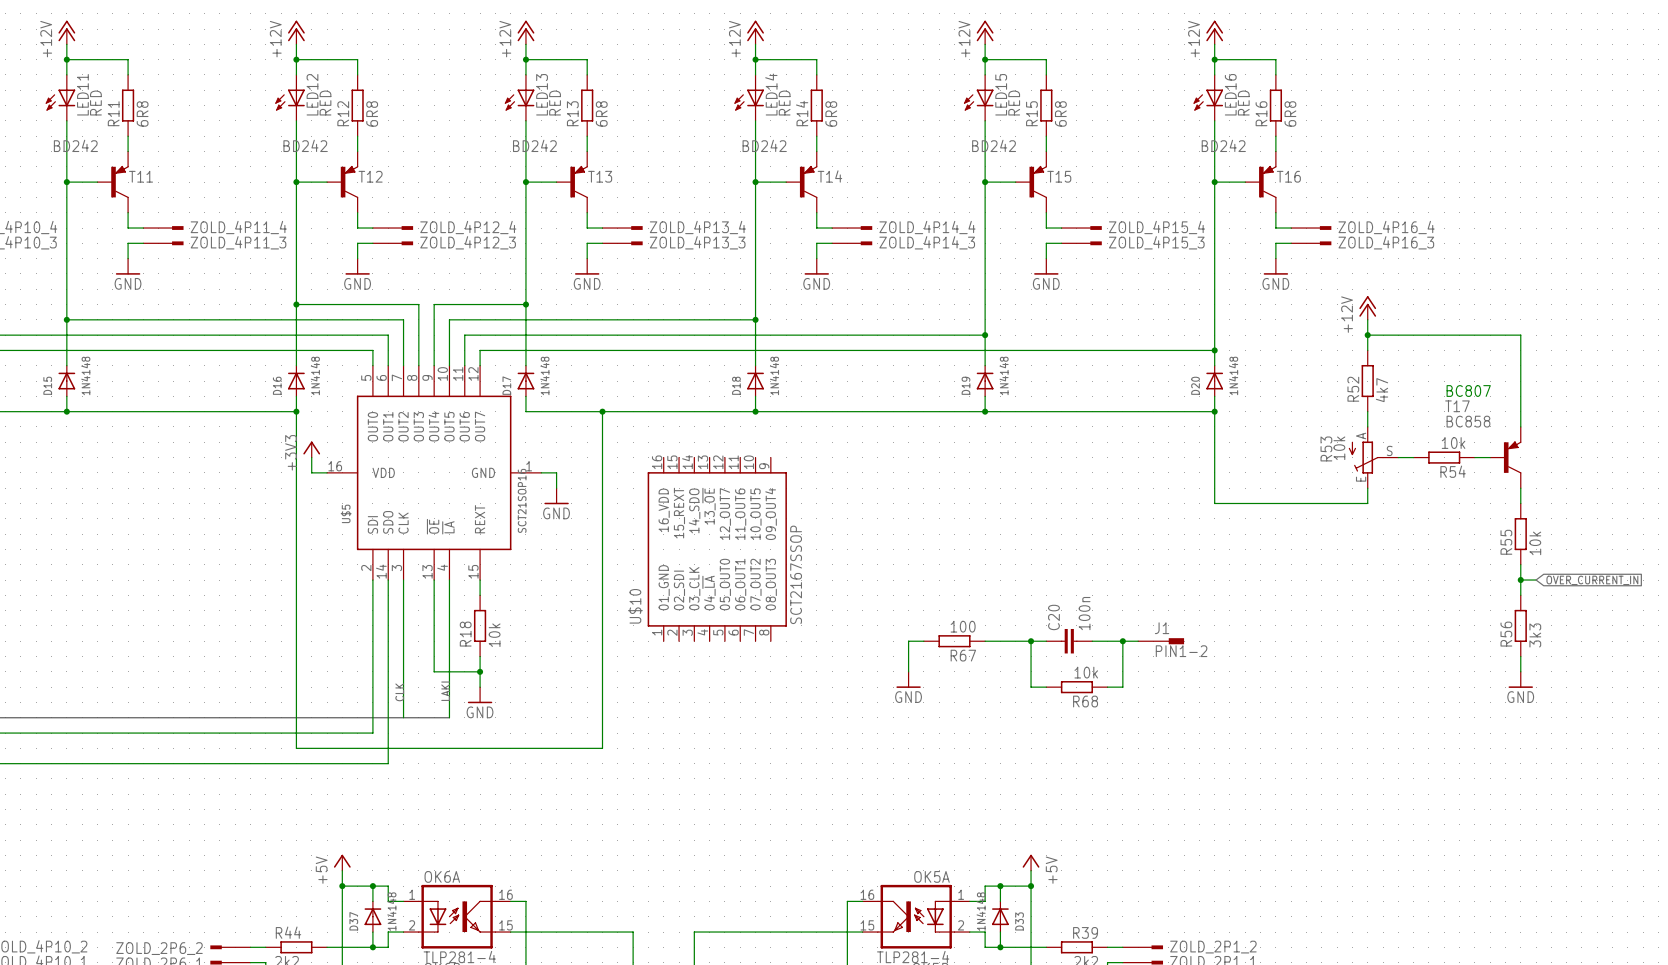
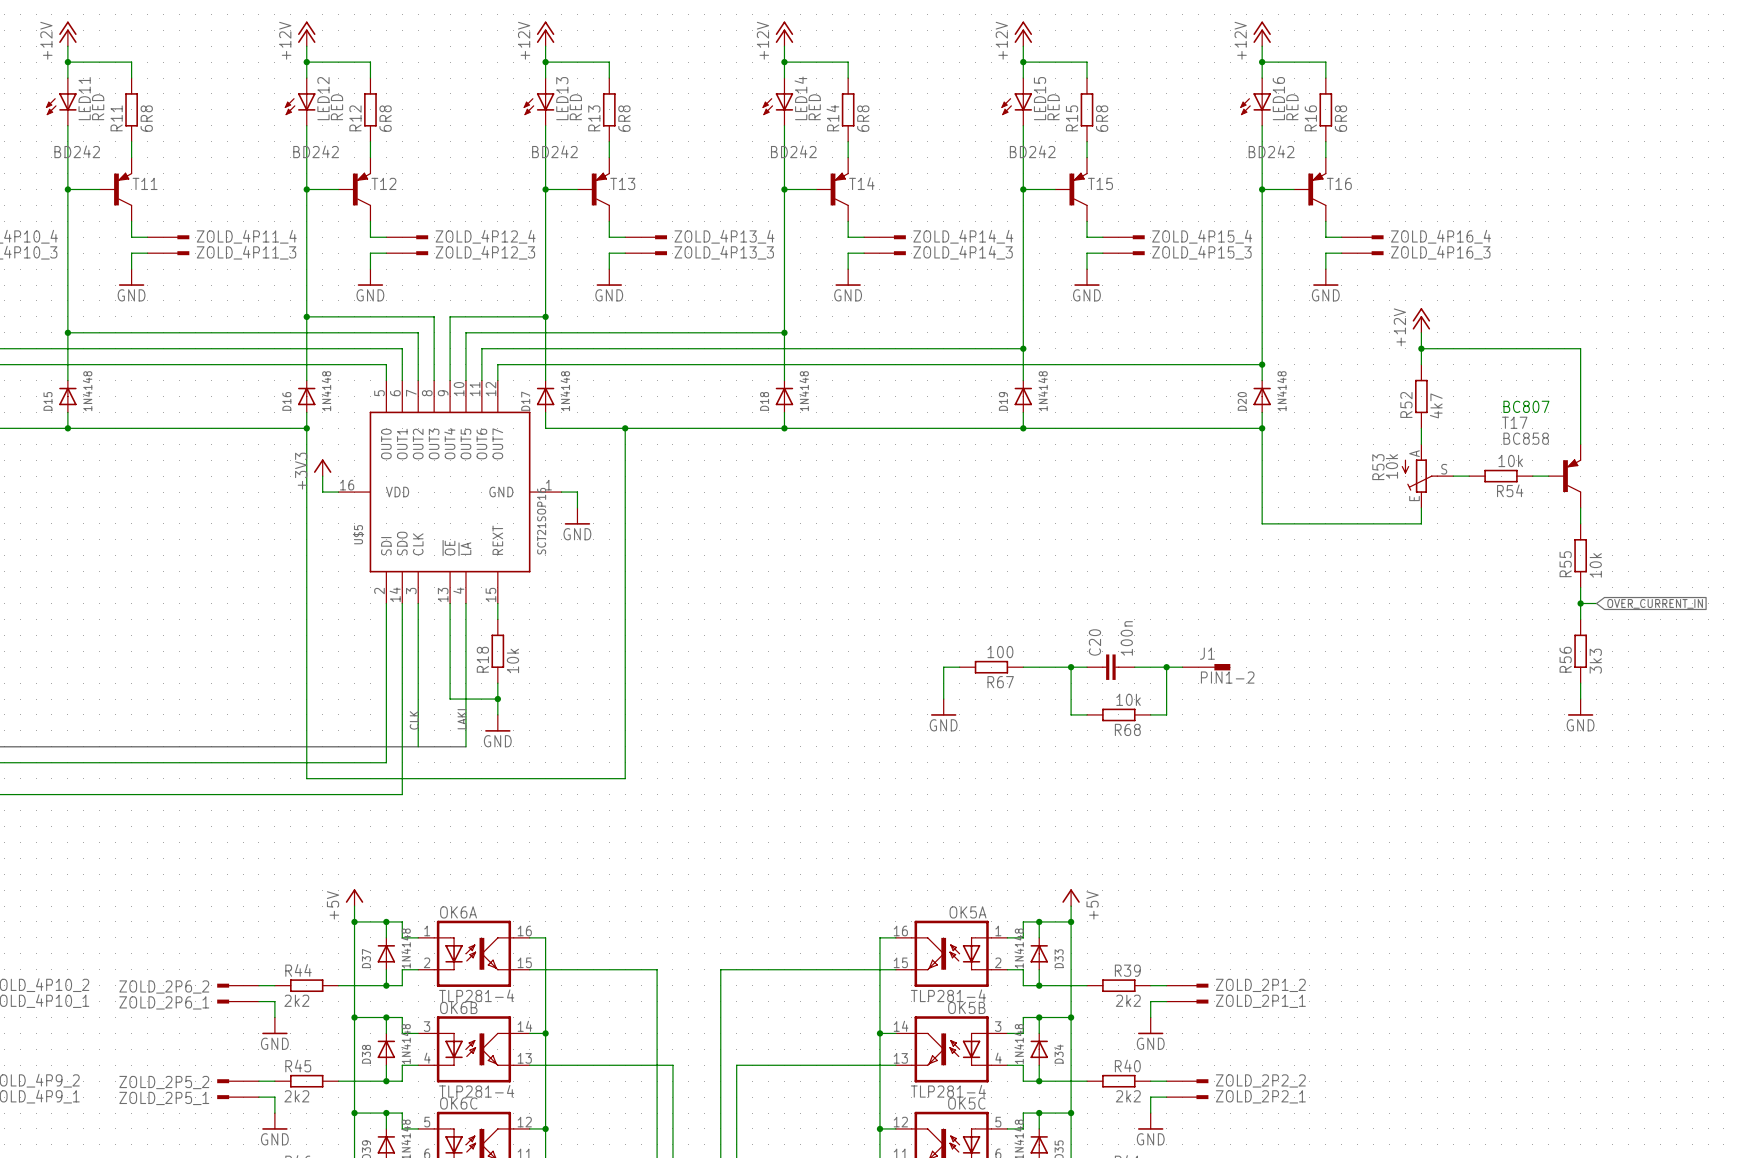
U$10: SCT2167SSOP (717, 549) -> none

